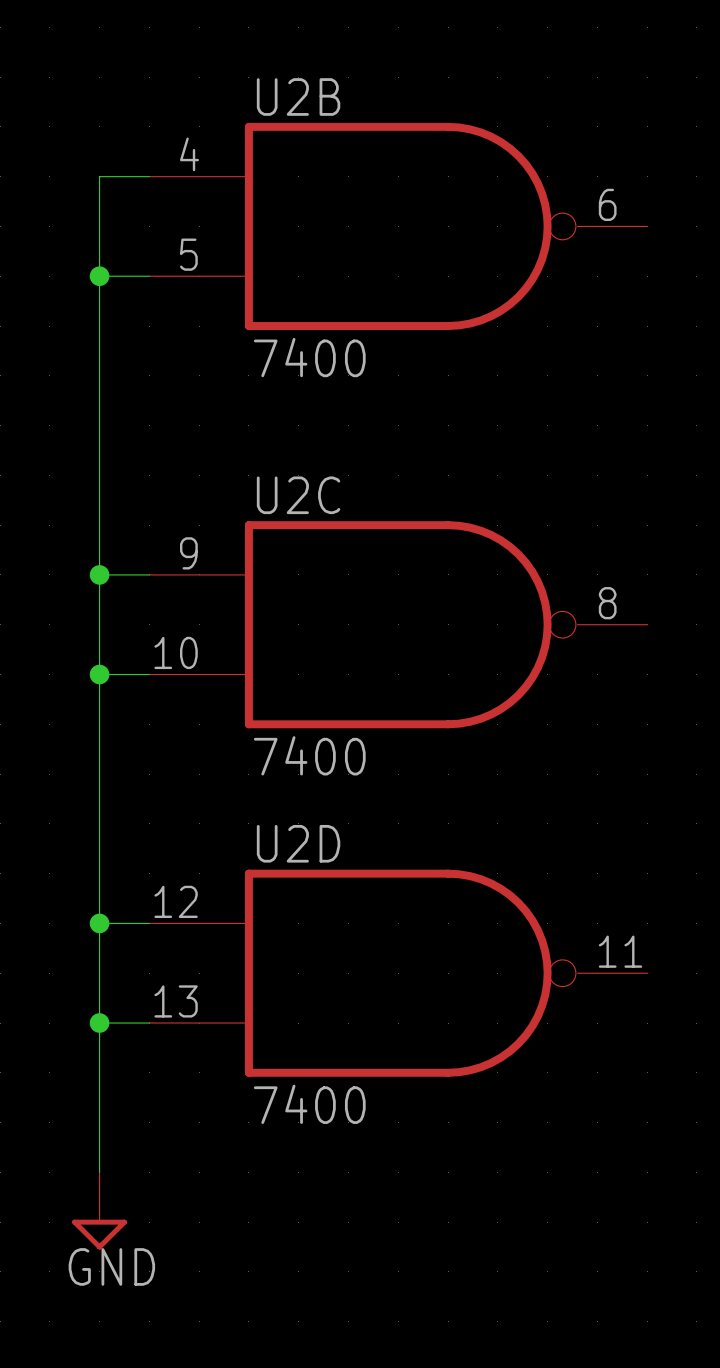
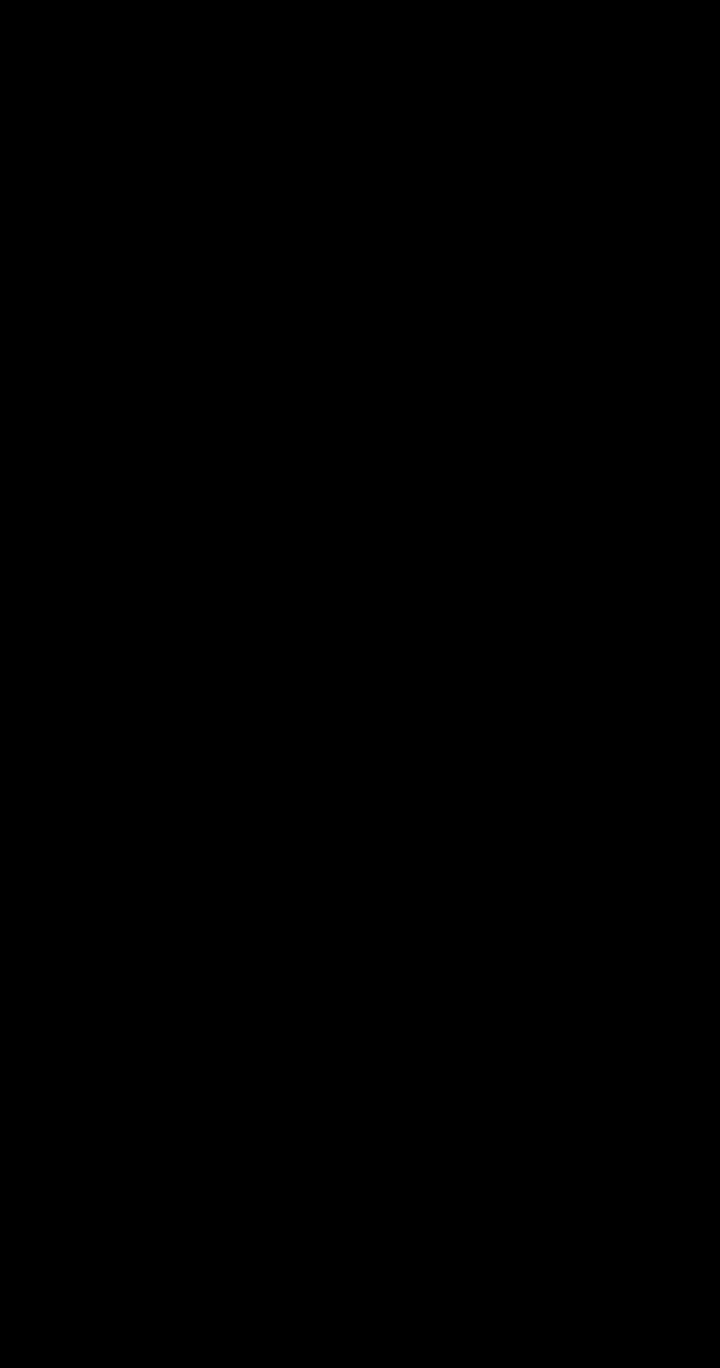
wire: (149, 176) (99, 176) (99, 1172) -> none
U2B: 7400 (398, 226) -> none
wire: (99, 276) (149, 276) -> none
junction: (99, 276) -> none
wire: (99, 574) (149, 574) -> none
junction: (99, 574) -> none
U2C: 7400 (398, 624) -> none
wire: (99, 674) (149, 674) -> none
junction: (99, 674) -> none
wire: (99, 923) (149, 923) -> none
junction: (99, 923) -> none
U2D: 7400 (398, 973) -> none
wire: (99, 1023) (149, 1023) -> none
junction: (99, 1023) -> none
power symbol: GND (99, 1210) -> none

